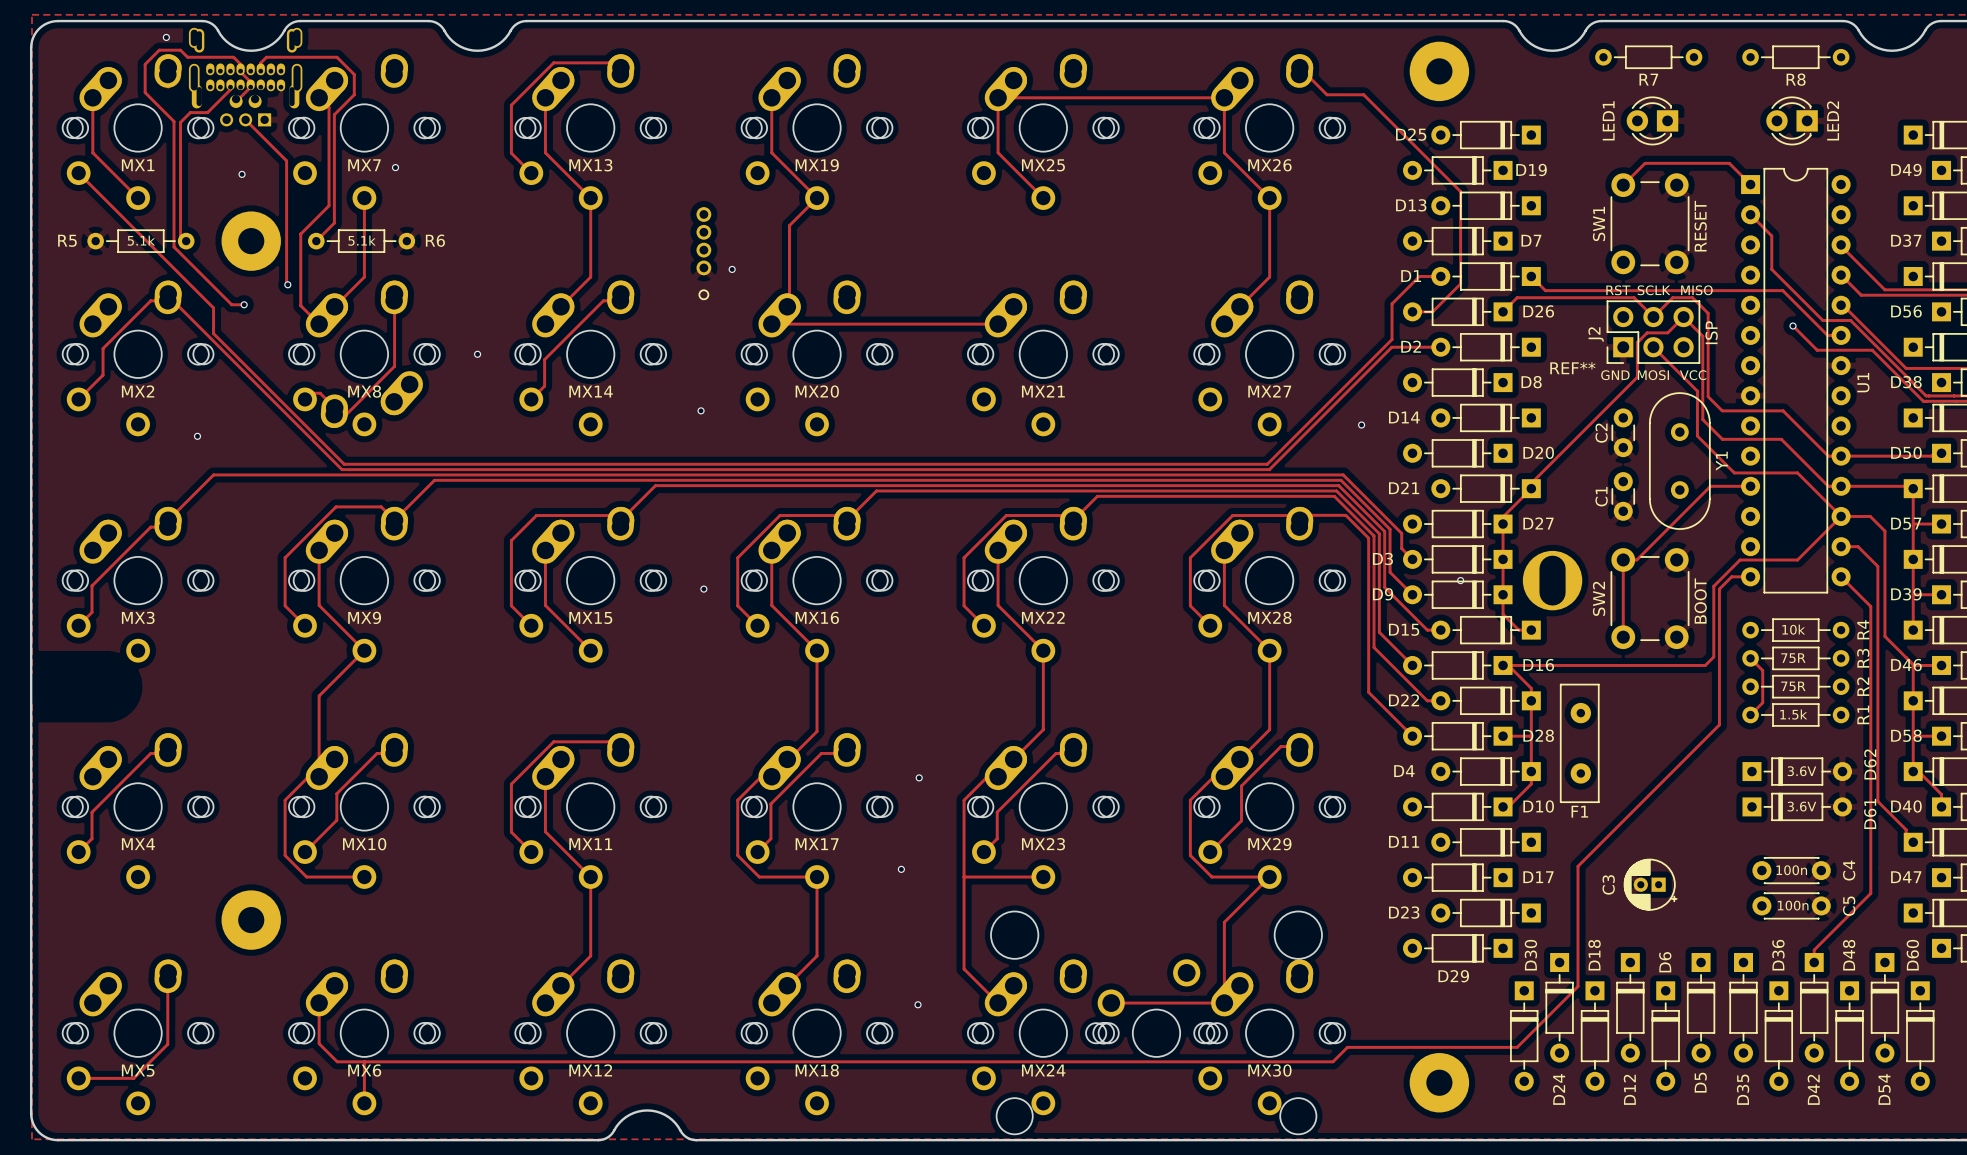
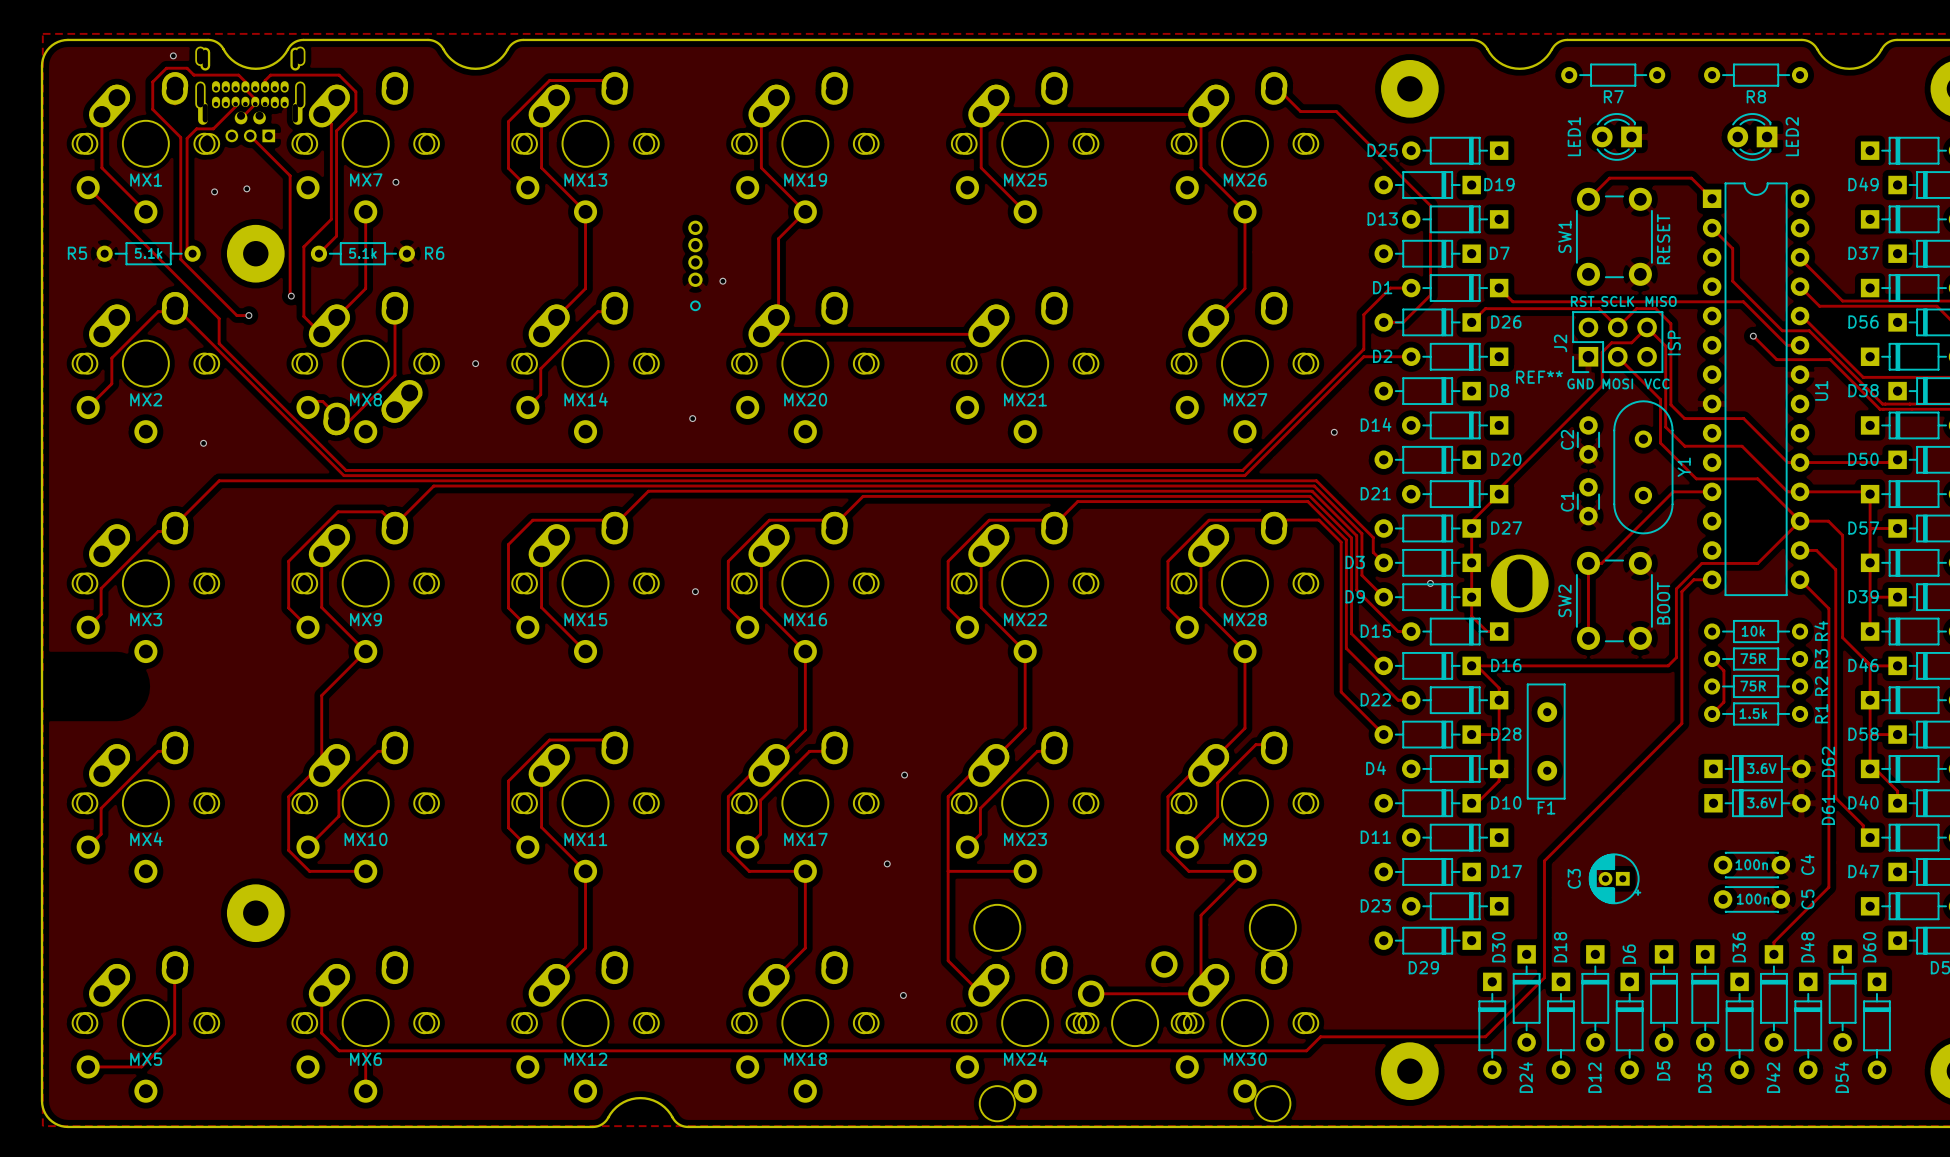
via: none -> (214, 191)

